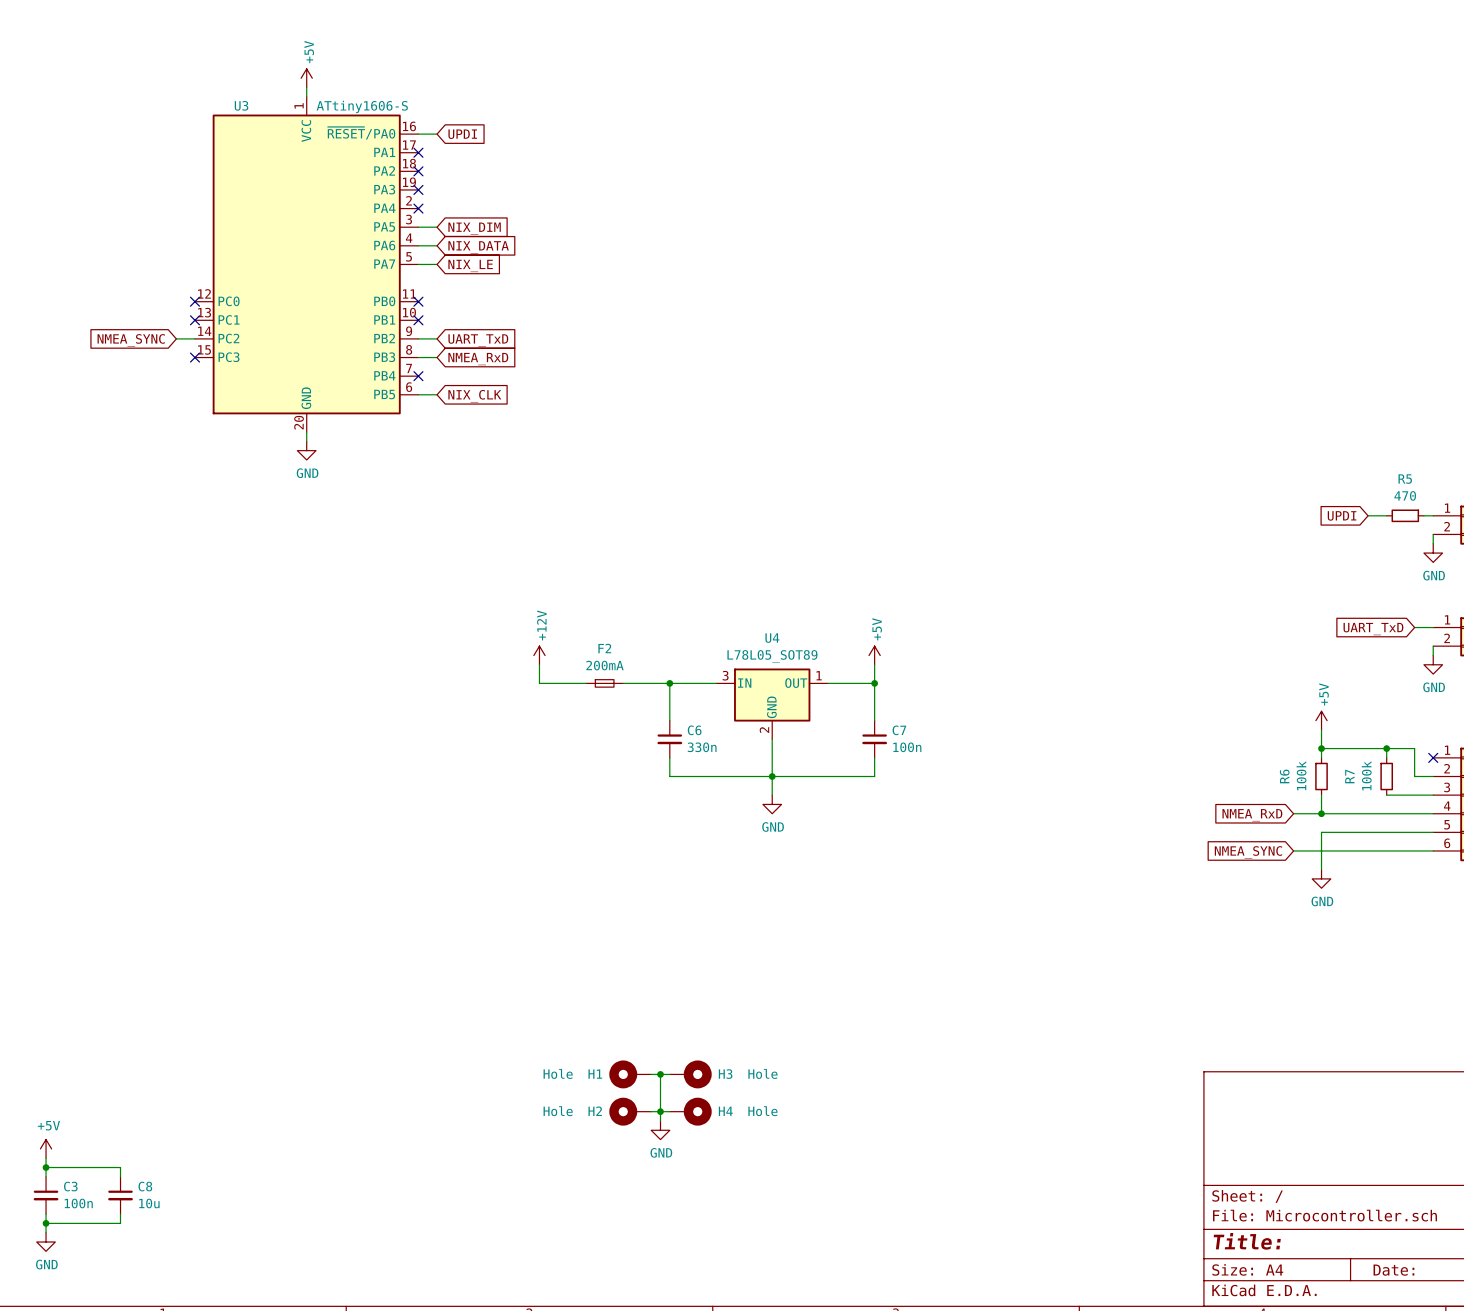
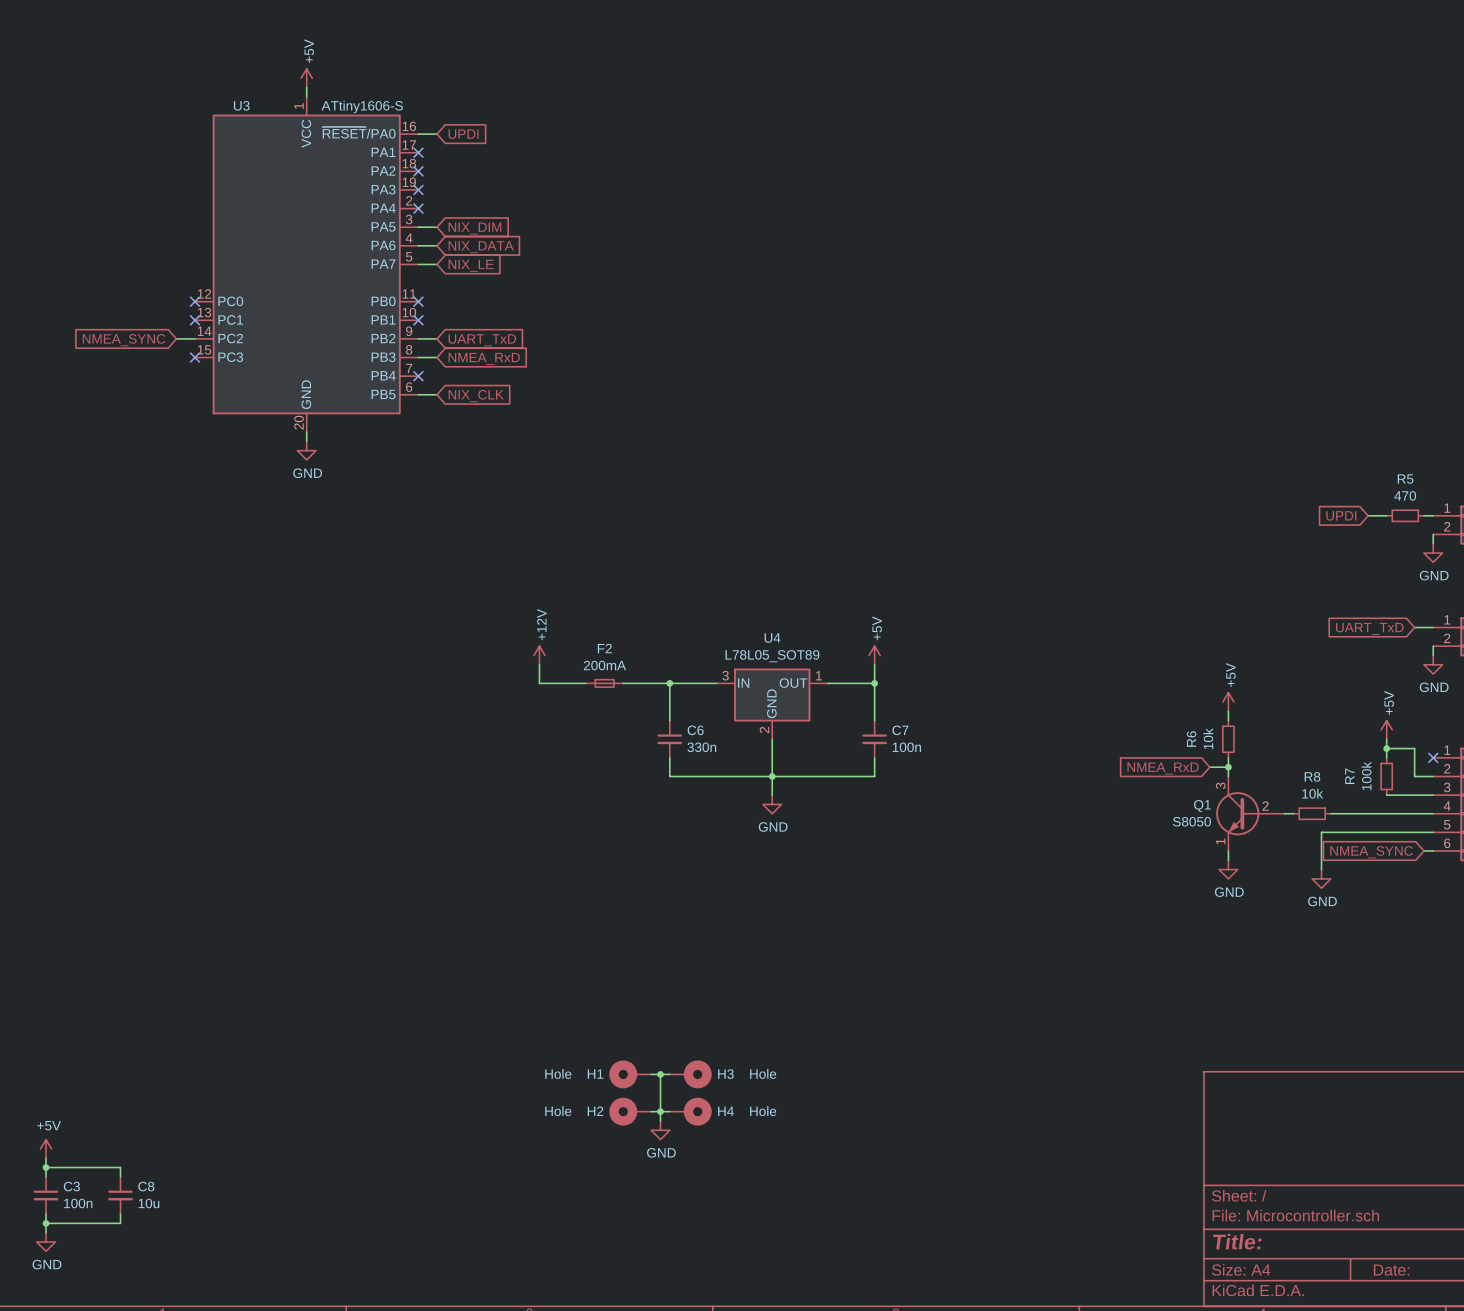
power symbol: none -> +5V (1228, 702)
wire: none -> (1228, 711) (1228, 720)
power symbol: +5V (1321, 720) -> none
wire: (1321, 729) (1321, 757) -> none
power symbol: none -> +5V (1386, 729)
wire: (1321, 748) (1386, 748) -> (1386, 739) (1386, 748)
junction: (1321, 748) -> none
wire: none -> (1209, 767) (1228, 767)
junction: none -> (1228, 767)
R6 value: 100k (1301, 775) -> 10k (1208, 738)
R6 position: (1321, 776) -> (1228, 739)
wire: (1321, 795) (1321, 813) -> (1228, 757) (1228, 776)
Q1: none -> S8050 (1250, 813)
wire: (1293, 813) (1330, 813) -> (1293, 813) (1284, 813)
R8: none -> 10k (1312, 813)
junction: (1321, 813) -> none
global label position: NMEA_RxD (1252, 815) -> NMEA_RxD (1163, 768)
wire: none -> (1228, 850) (1228, 860)
wire: (1293, 850) (1423, 850) -> none
global label position: NMEA_SYNC (1248, 852) -> NMEA_SYNC (1371, 852)
power symbol: none -> GND (1228, 869)

